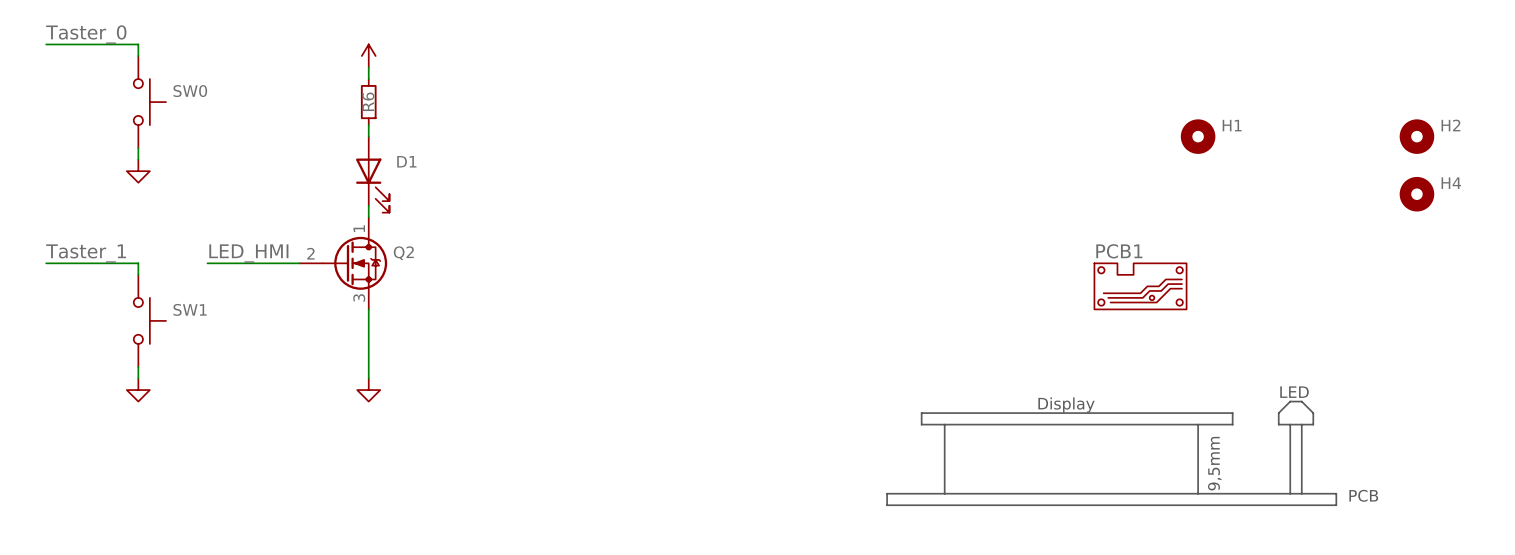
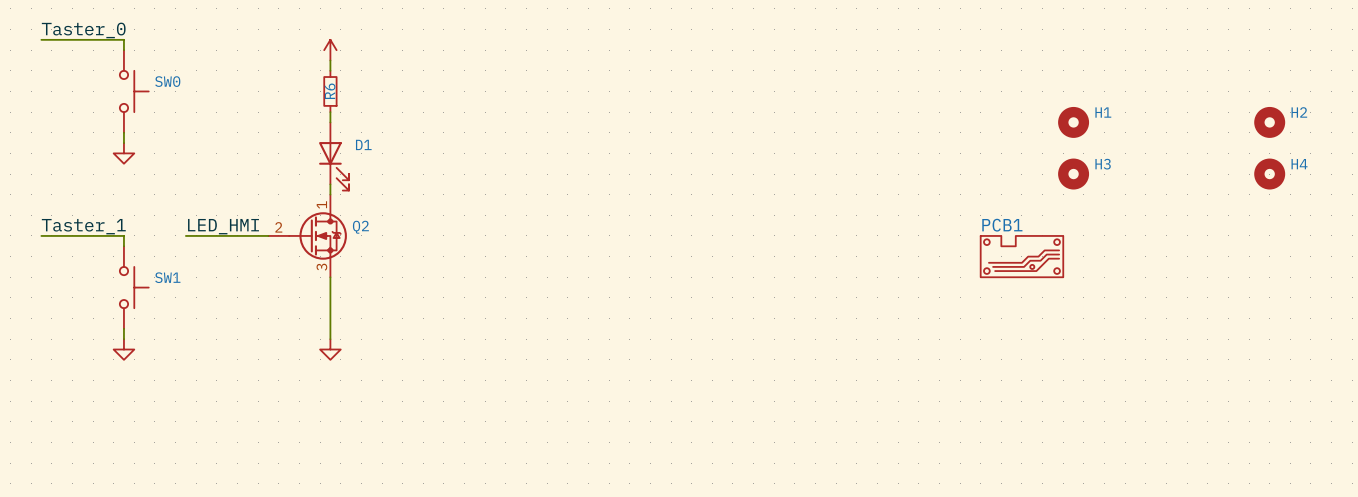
H3: none -> (1073, 174)
text: LED (1294, 392) -> none
line: (1290, 401) (1278, 413) (1278, 424) (1313, 424) (1313, 413) (1301, 401) (1290, 401) -> none
text: Display (1066, 405) -> none
line: (921, 413) (1232, 413) (1232, 424) (921, 424) (921, 413) -> none
line: (944, 424) (944, 493) -> none
line: (1198, 424) (1198, 493) -> none
line: (1290, 424) (1290, 493) -> none
line: (1301, 424) (1301, 493) -> none
text: 9,5mm (1214, 463) -> none
line: (887, 493) (1336, 493) (1336, 505) (887, 505) (887, 493) -> none
text: PCB (1363, 495) -> none

